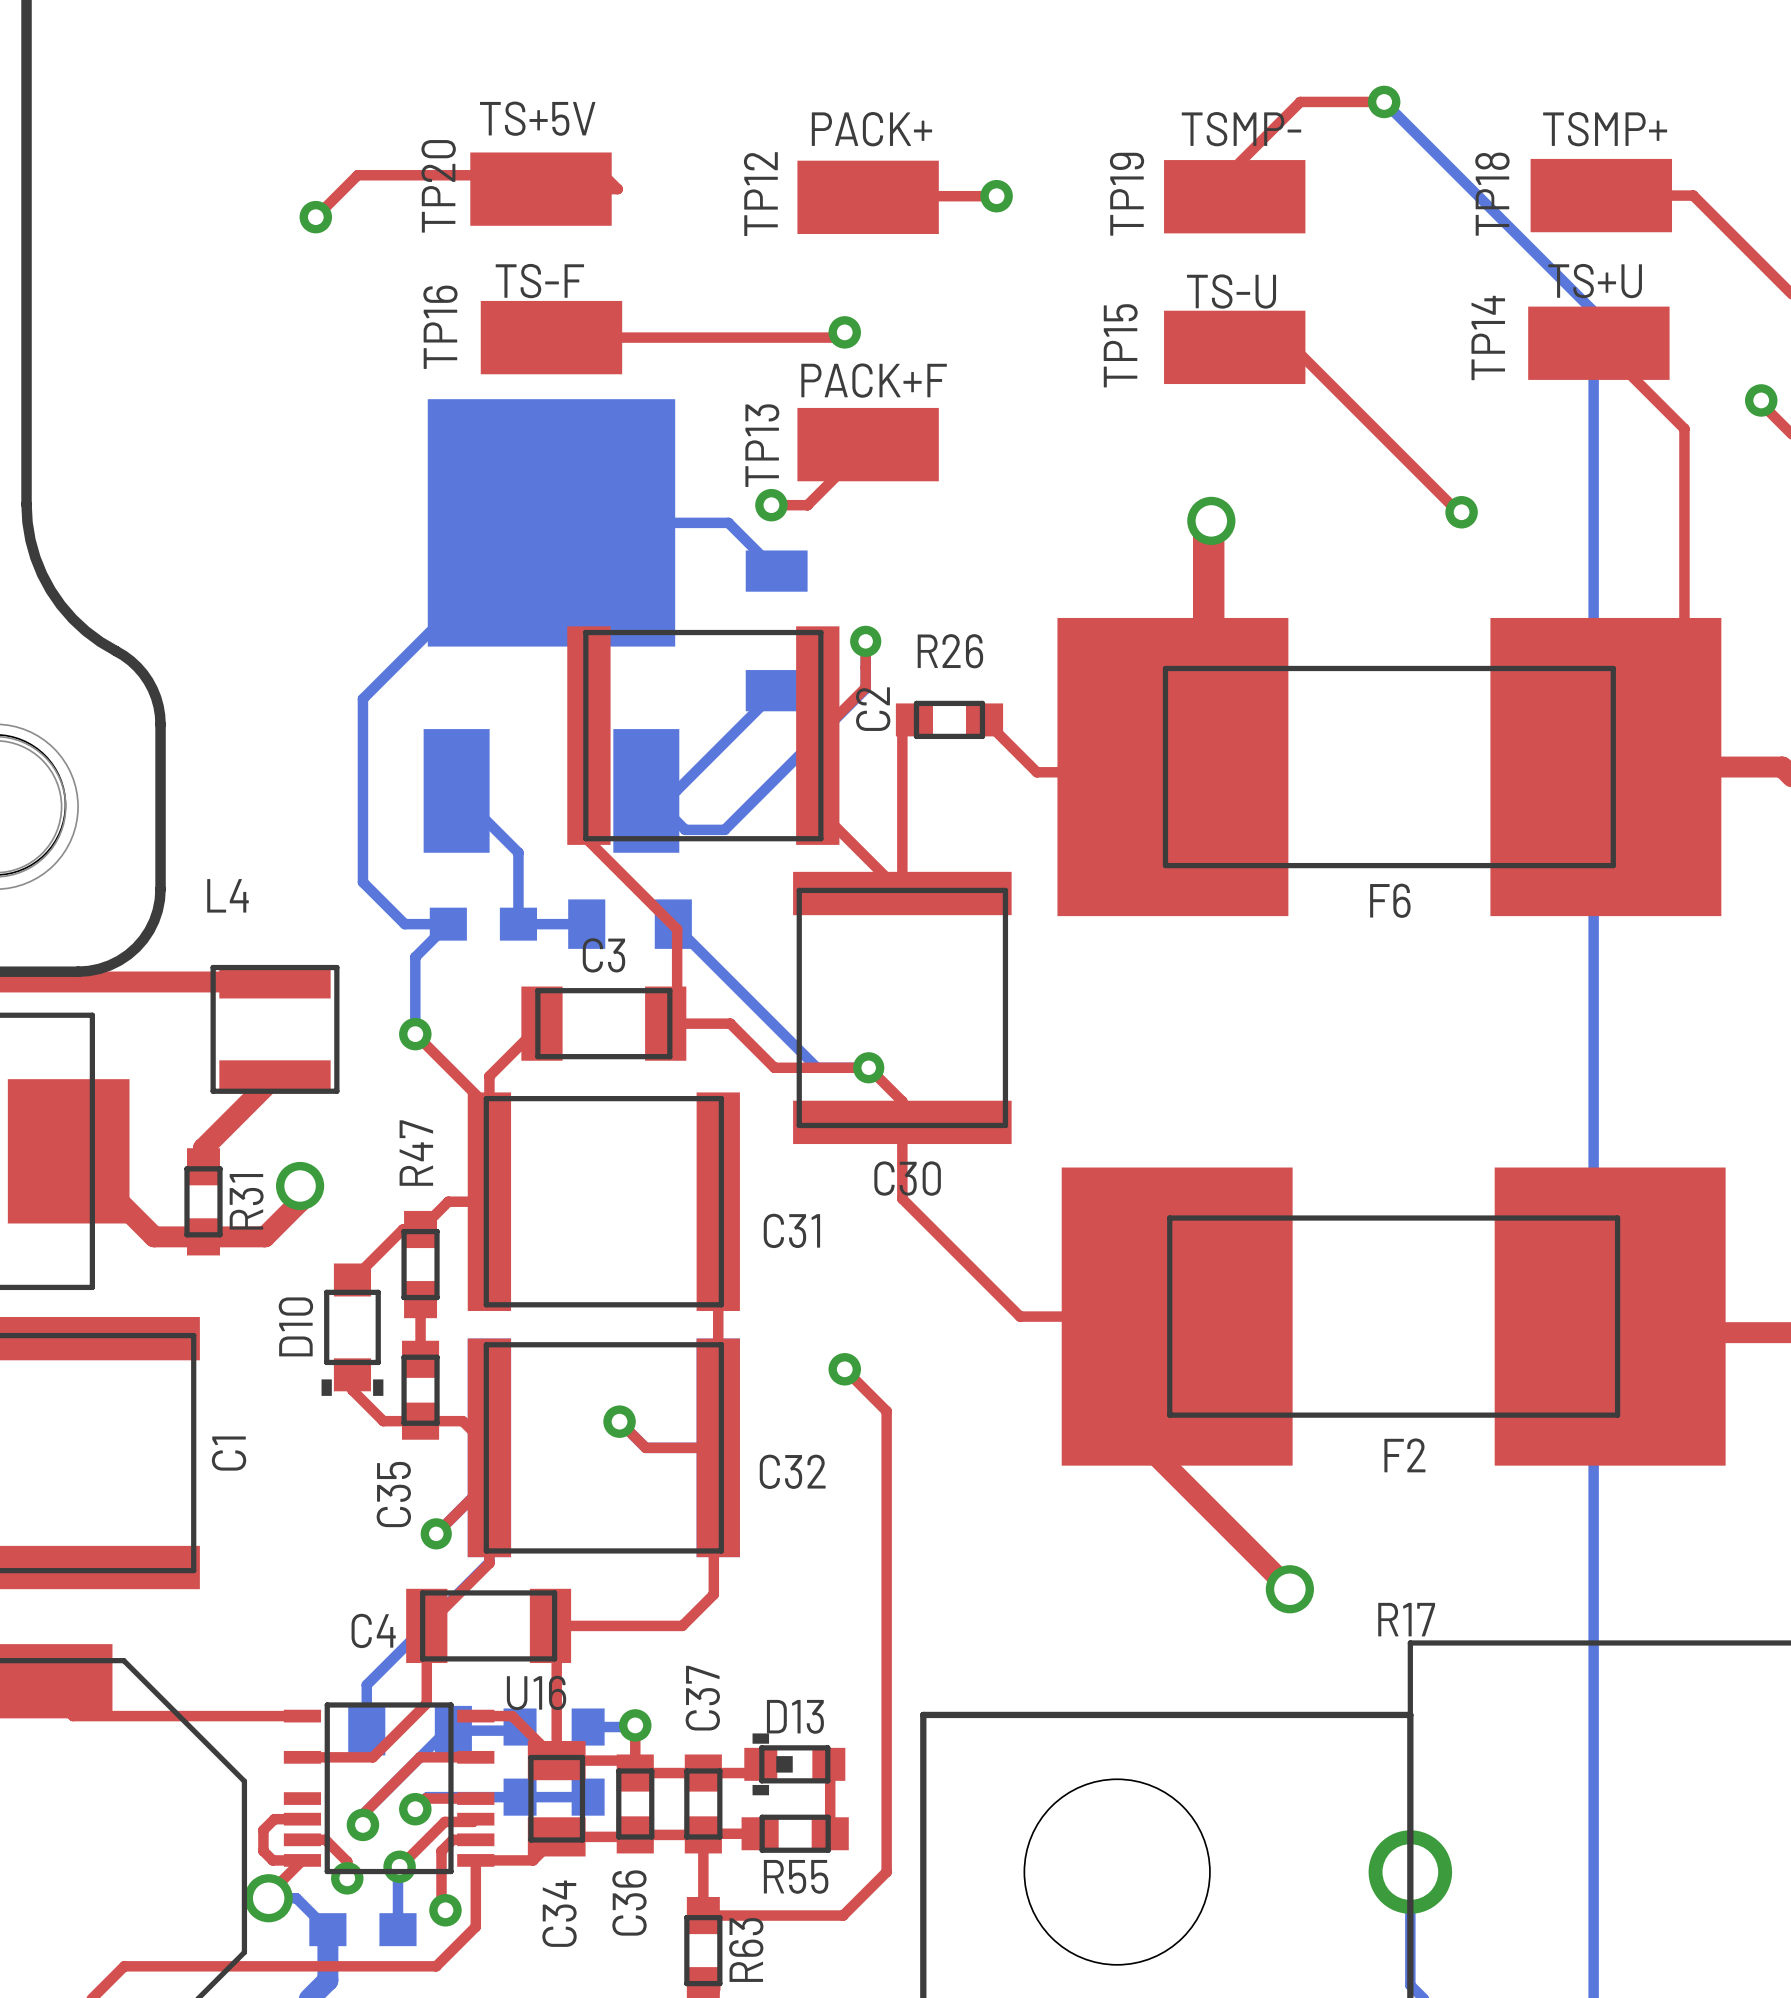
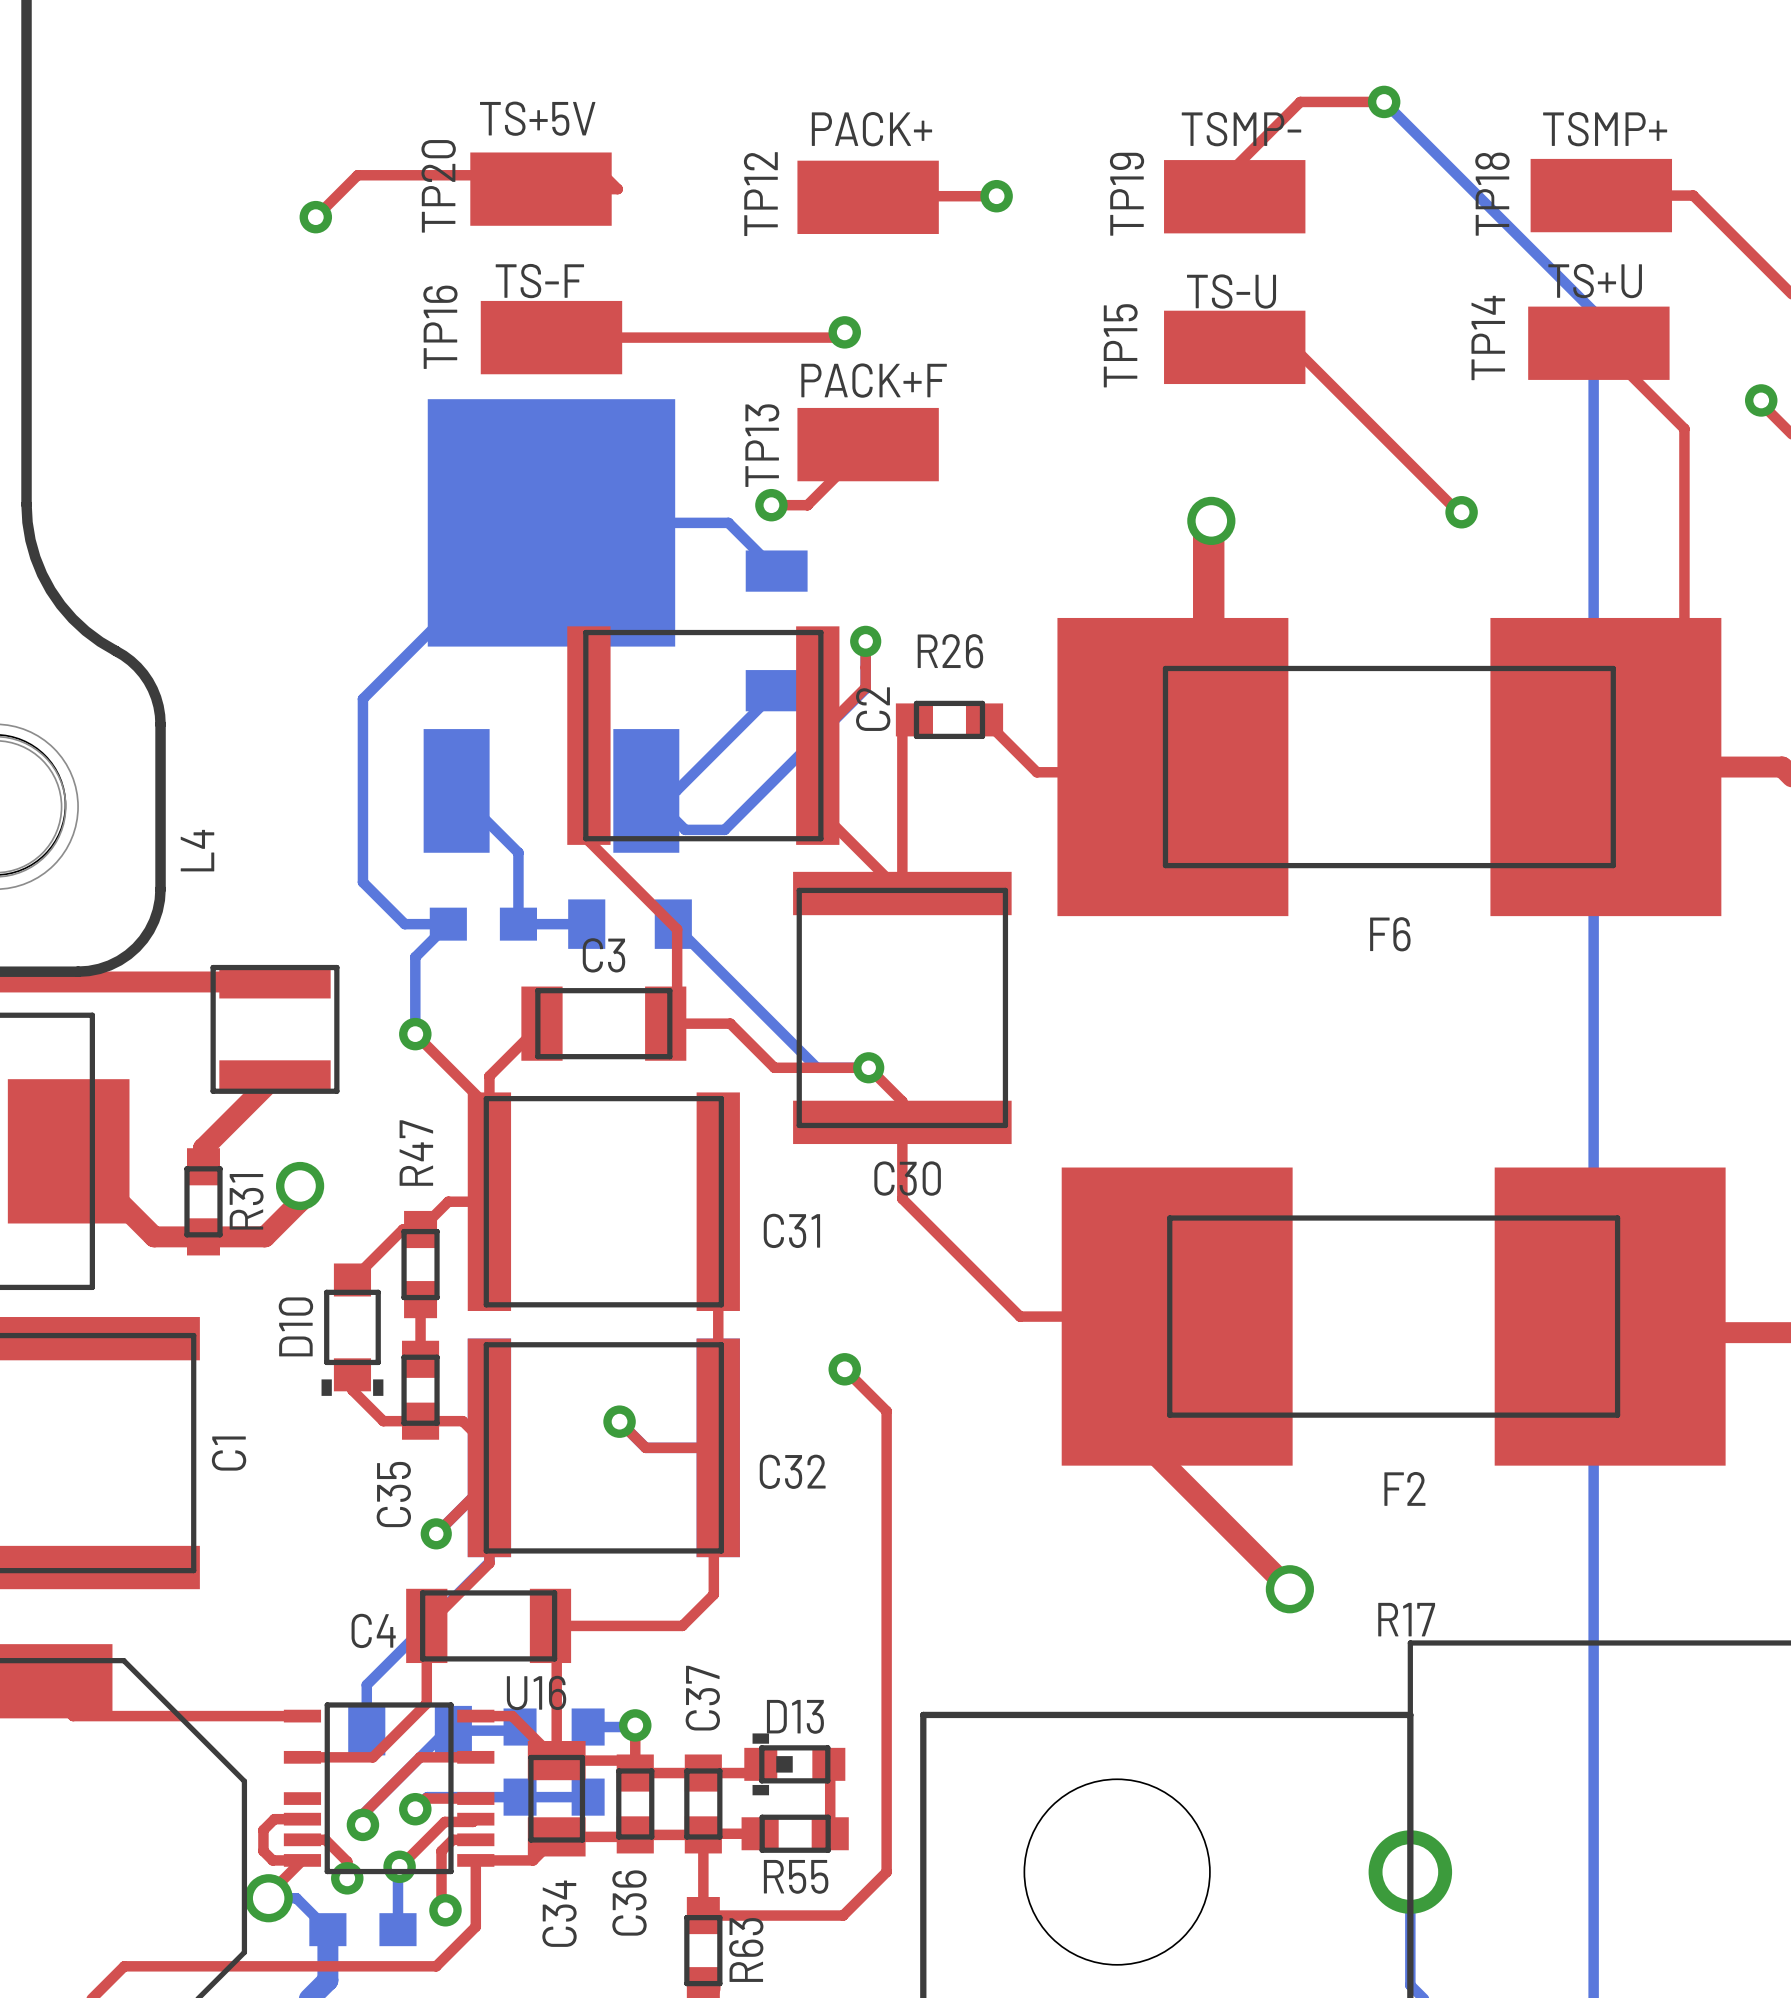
L4 name rotation: 0° (227, 895) -> 90° counterclockwise (197, 850)
F6 name position: F6 (1390, 900) -> F6 (1390, 934)
F2 name position: F2 (1404, 1455) -> F2 (1404, 1488)

